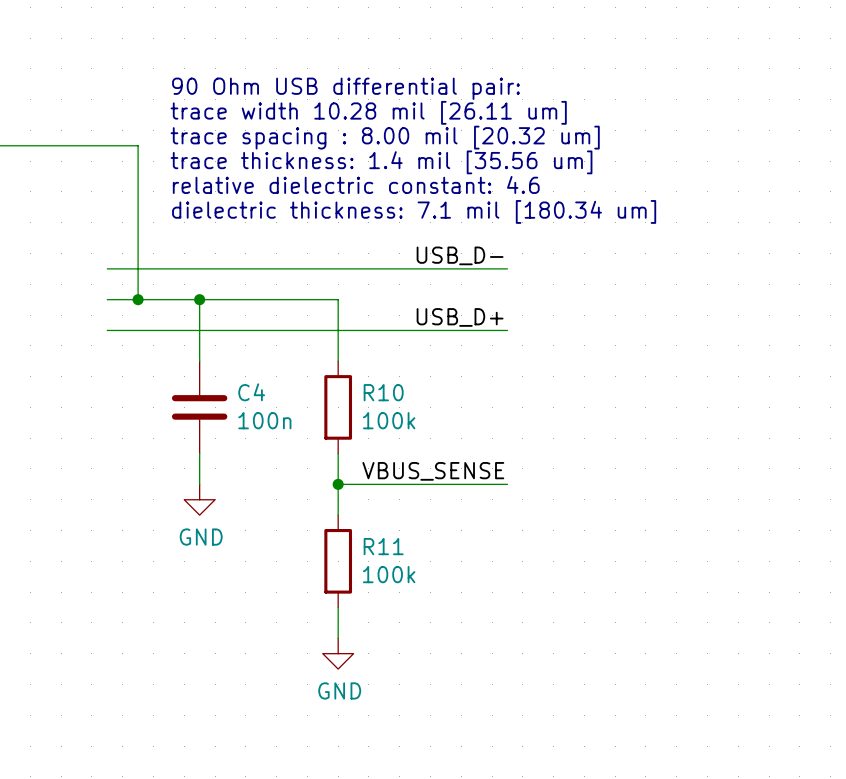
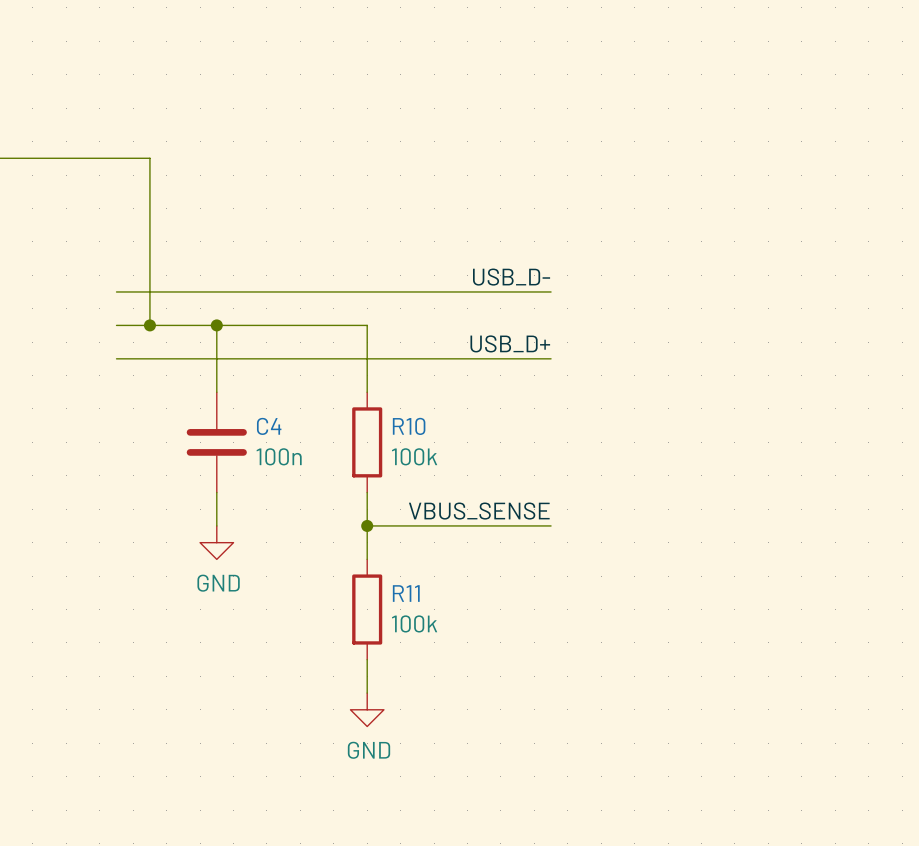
text: 90 Ohm USB differential pair: (345, 88) -> none
text: trace width 10.28 mil [26.11 um] (368, 112) -> none
text: trace spacing : 8.00 mil [20.32 um] (385, 137) -> none
text: trace thickness: 1.4 mil [35.56 um] (381, 162) -> none
text: relative dielectric constant: 4.6 (356, 184) -> none
text: dielectric thickness: 7.1 mil [180.34 um] (414, 211) -> none

